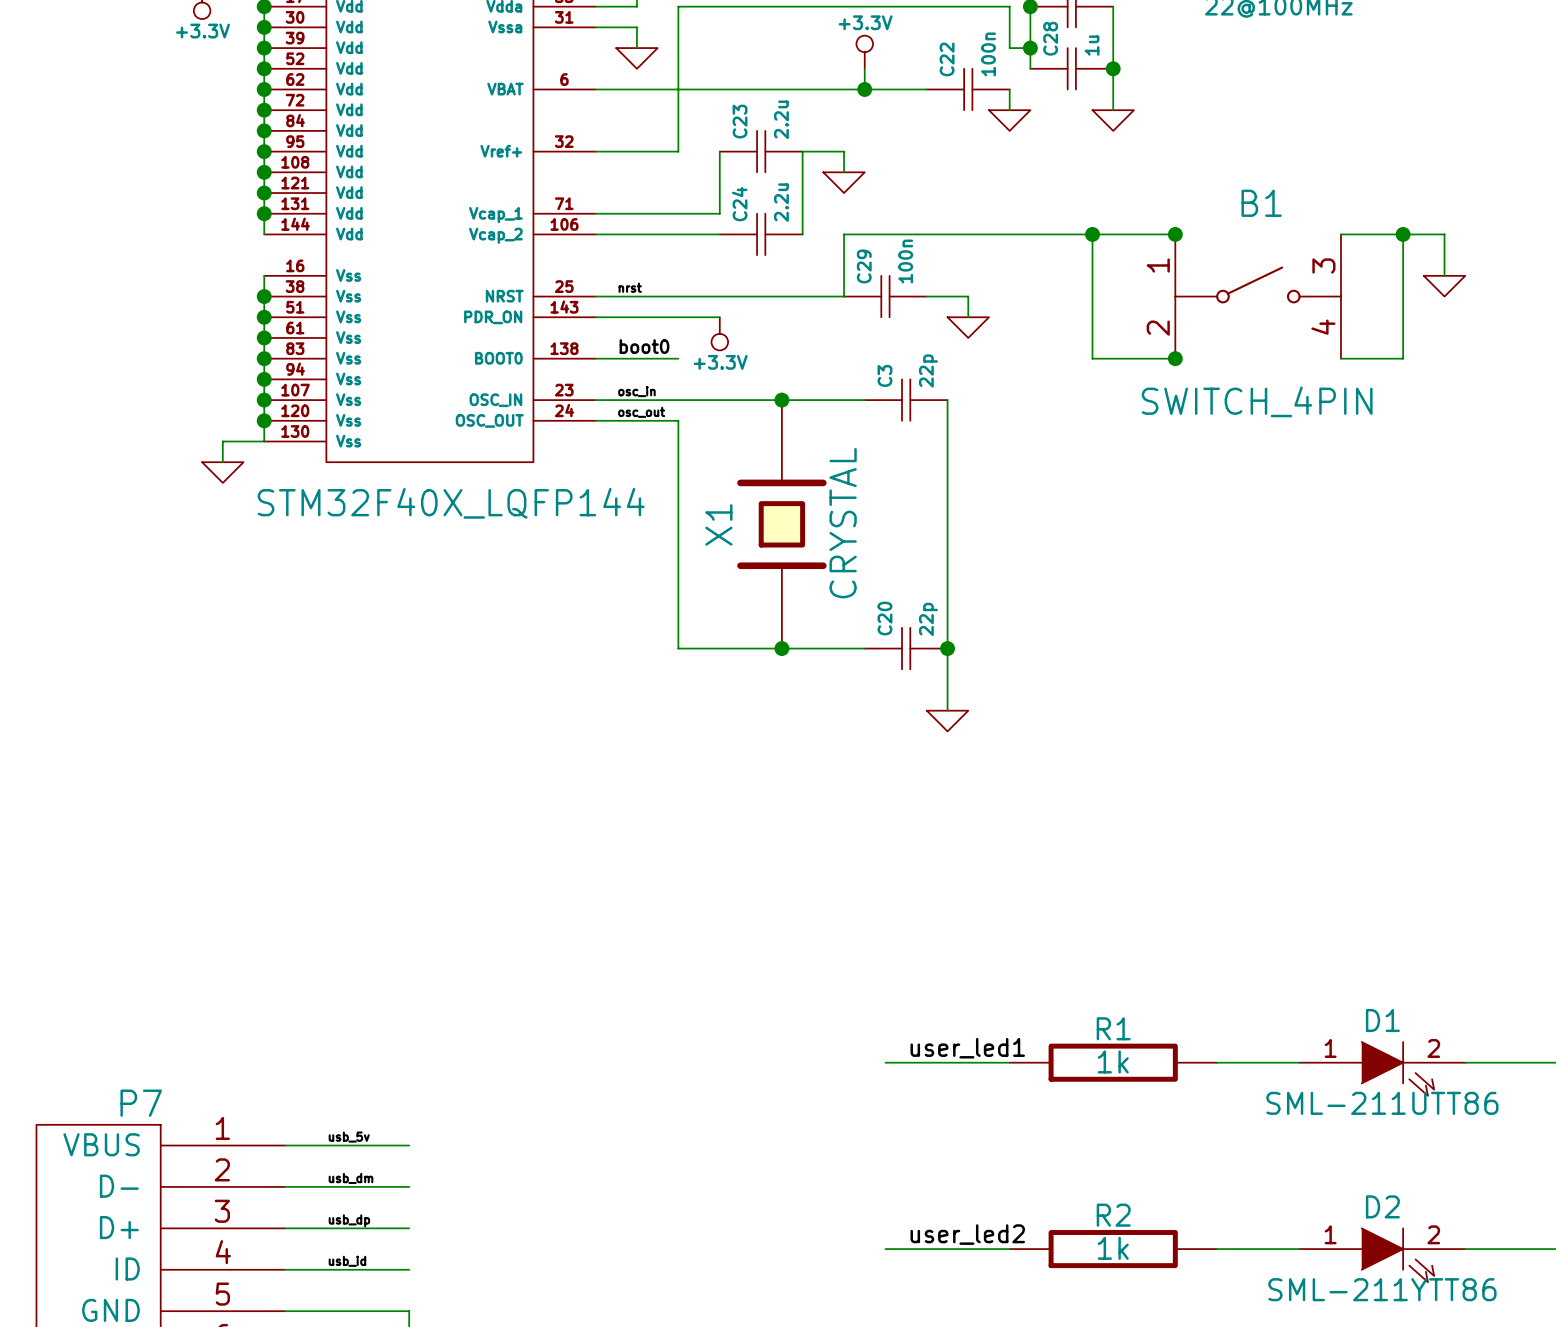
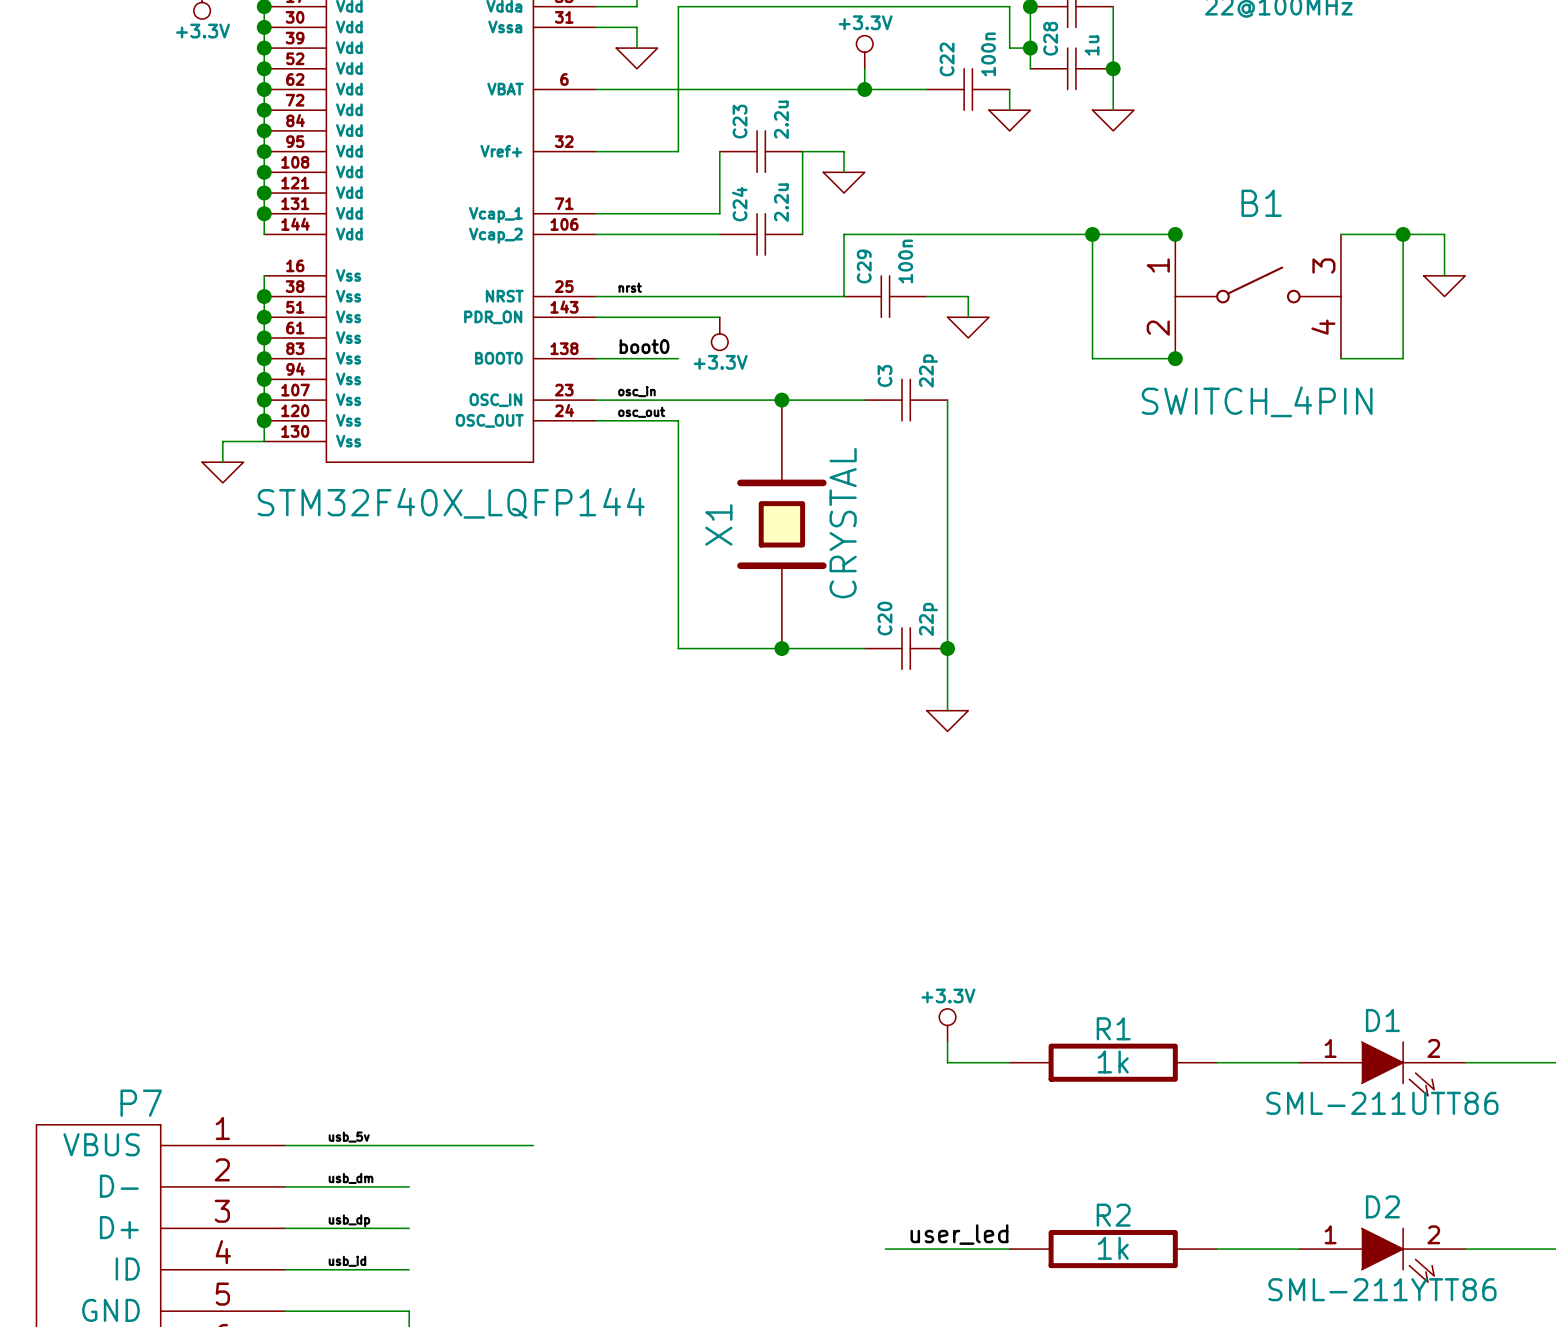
power symbol: none -> +3.3V (947, 1025)
label: user_led1 (967, 1048) -> none
wire: (885, 1062) (947, 1062) -> (947, 1041) (947, 1062)
wire: none -> (409, 1145) (533, 1145)
label: user_led2 (967, 1234) -> user_led (959, 1234)

